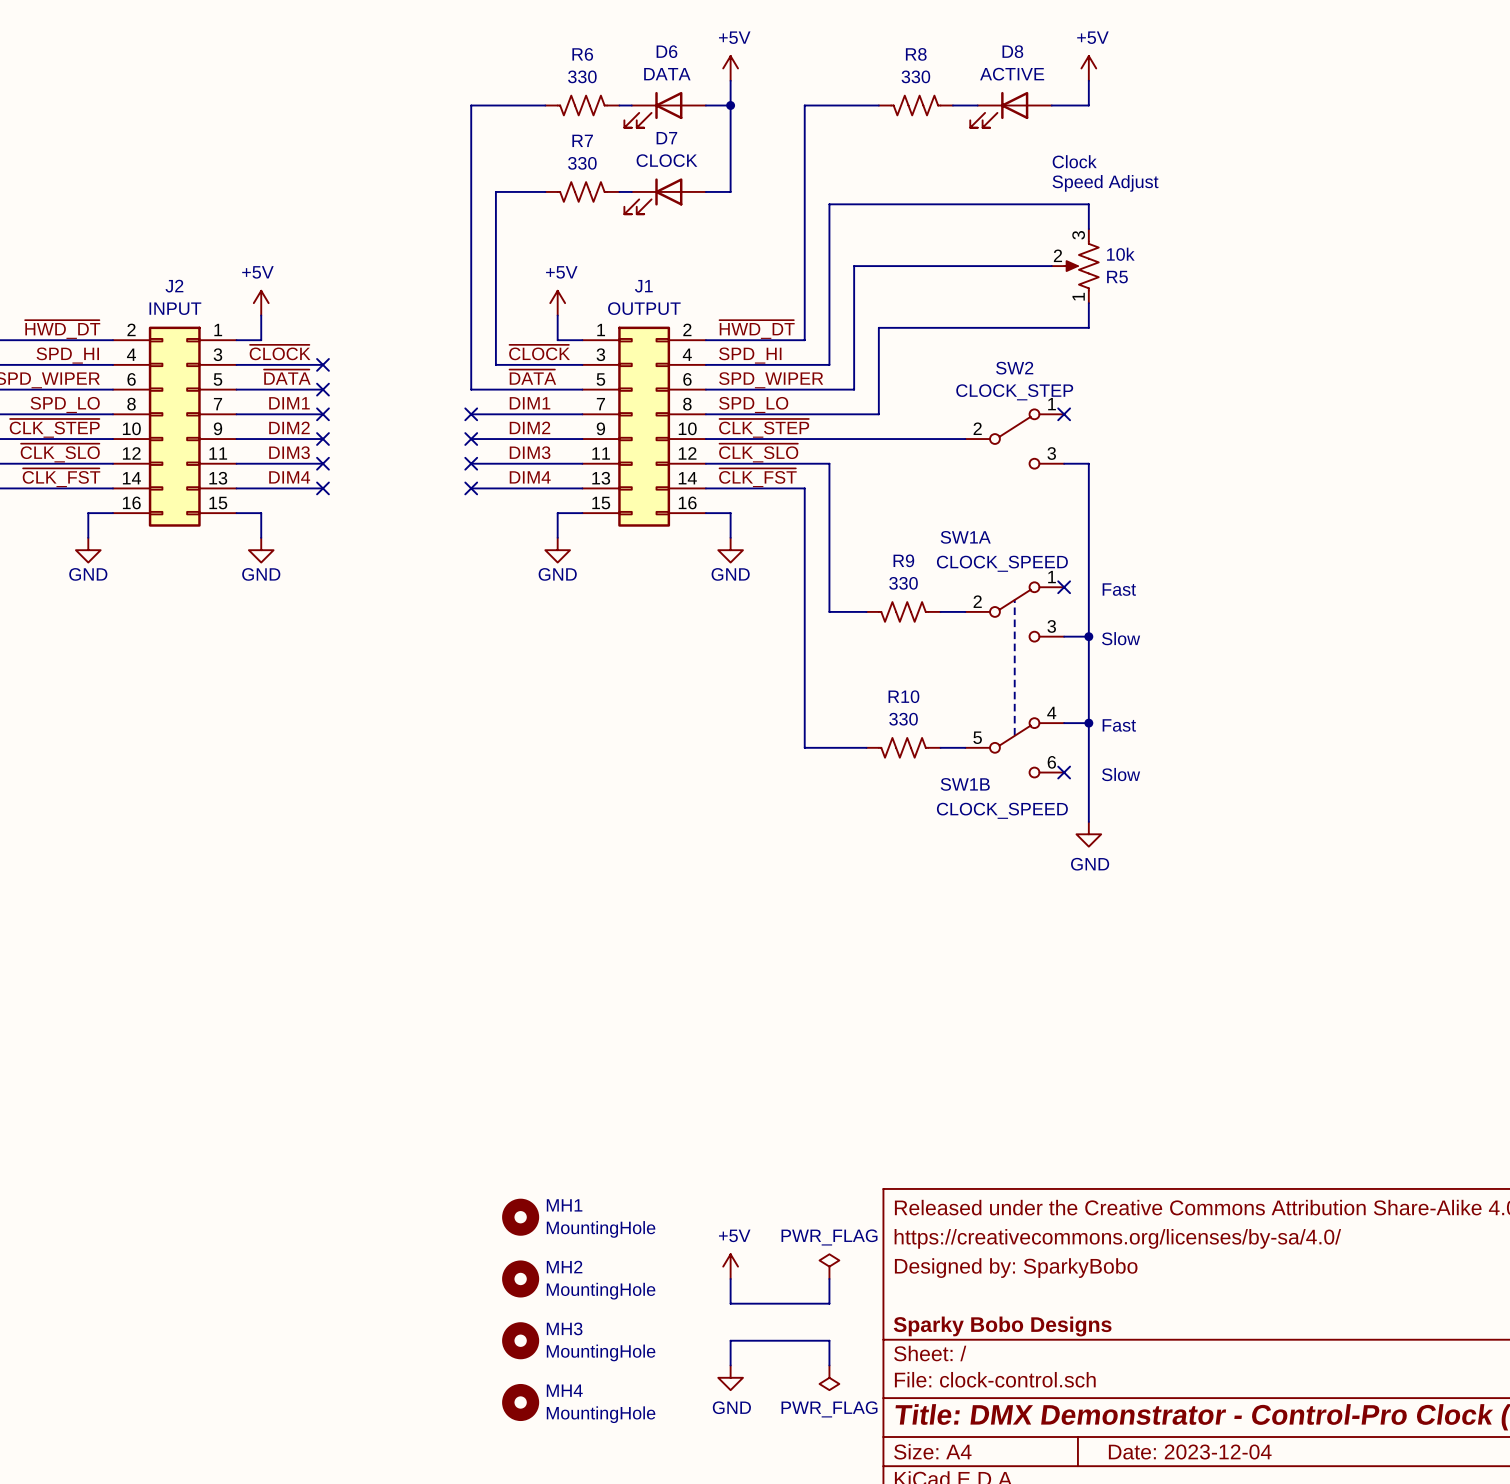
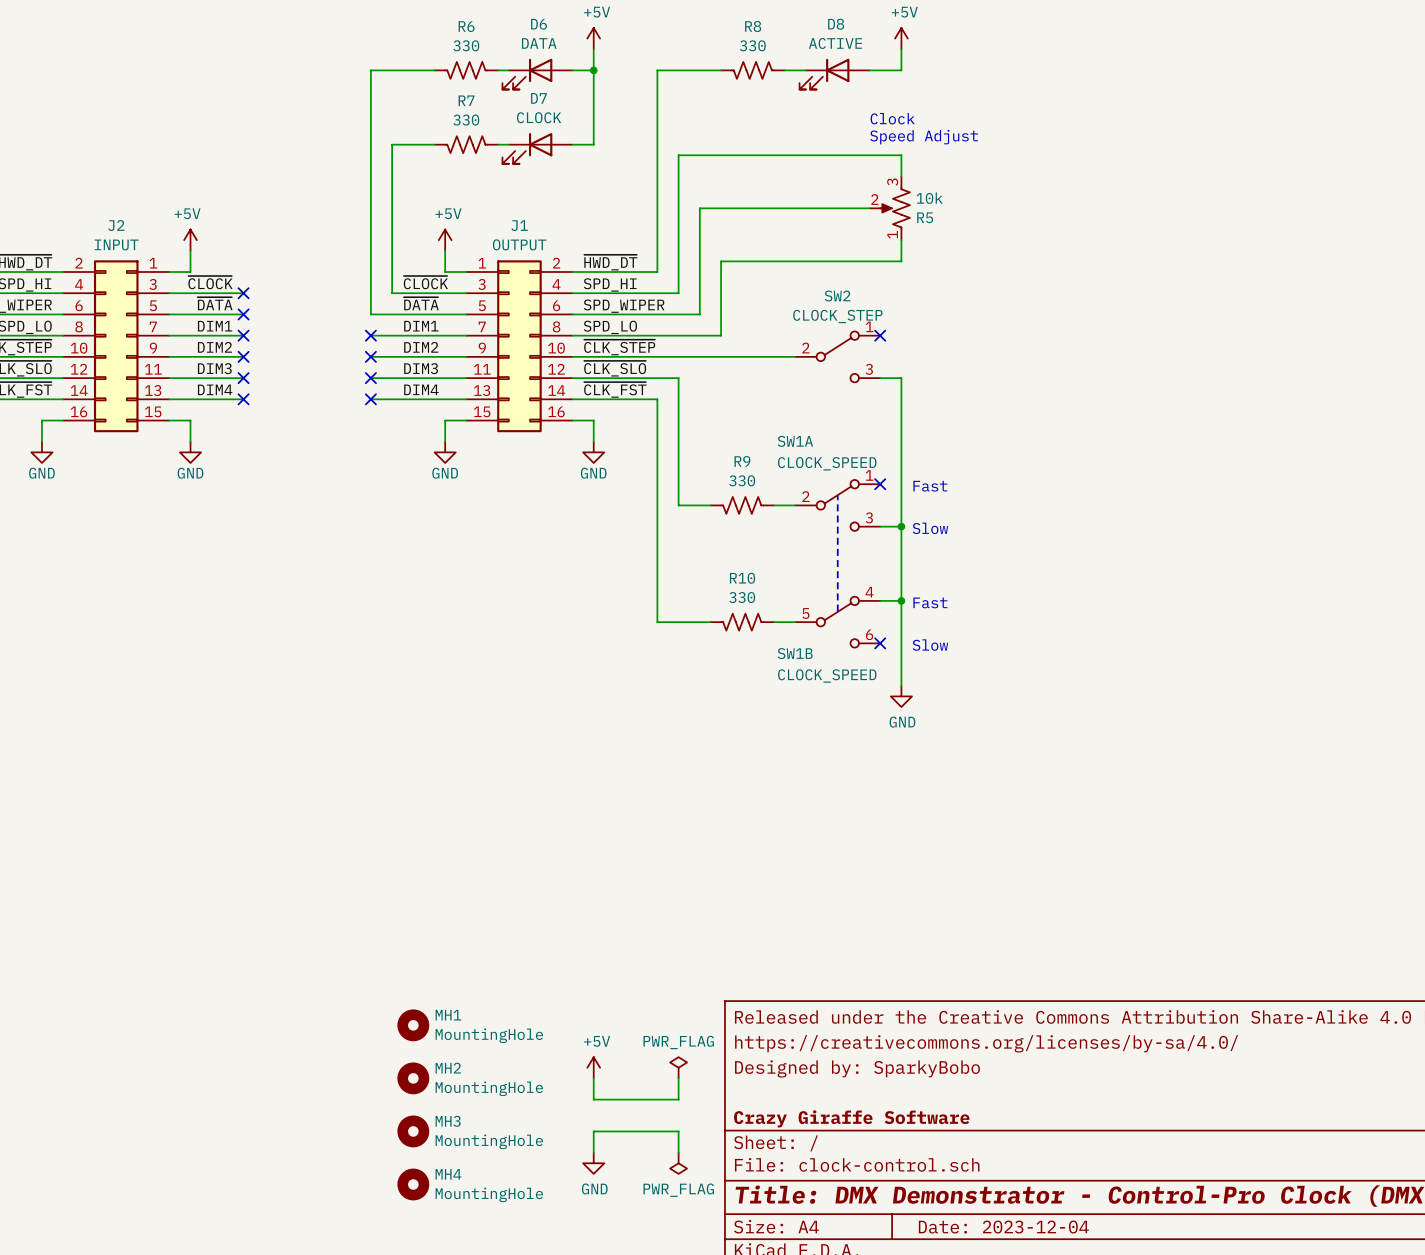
title block: Sparky Bobo Designs (1002, 1326) -> Crazy Giraffe Software (851, 1118)

